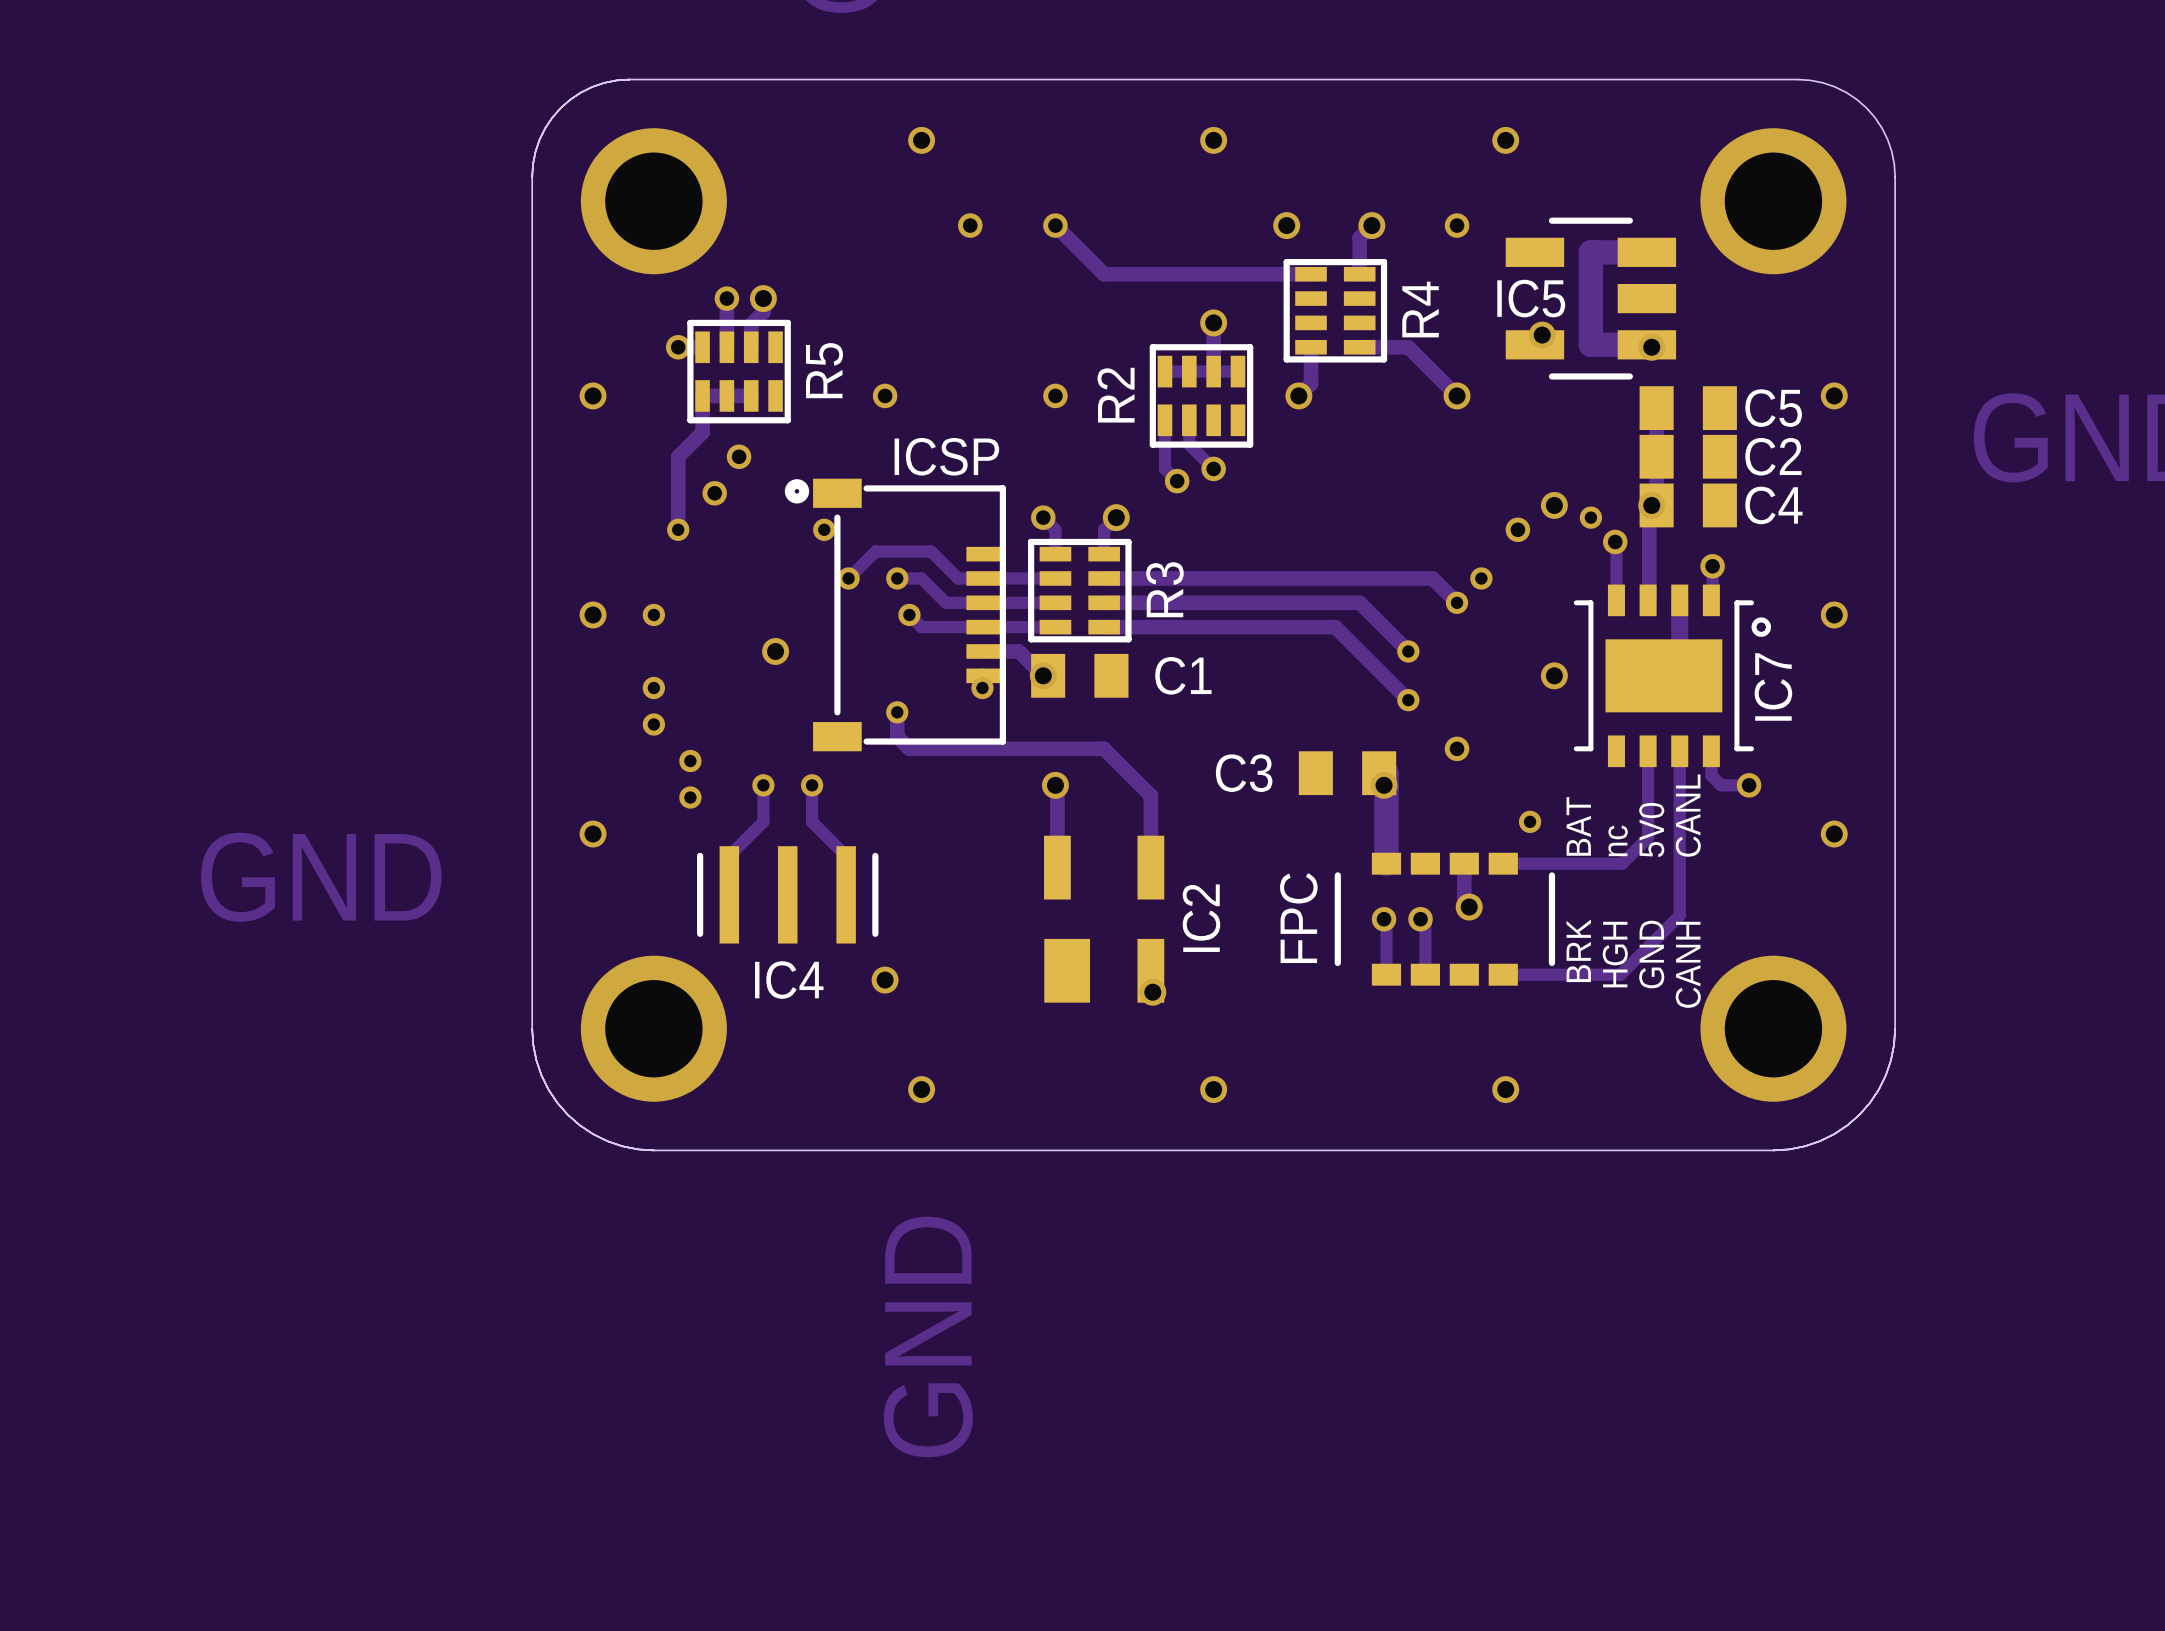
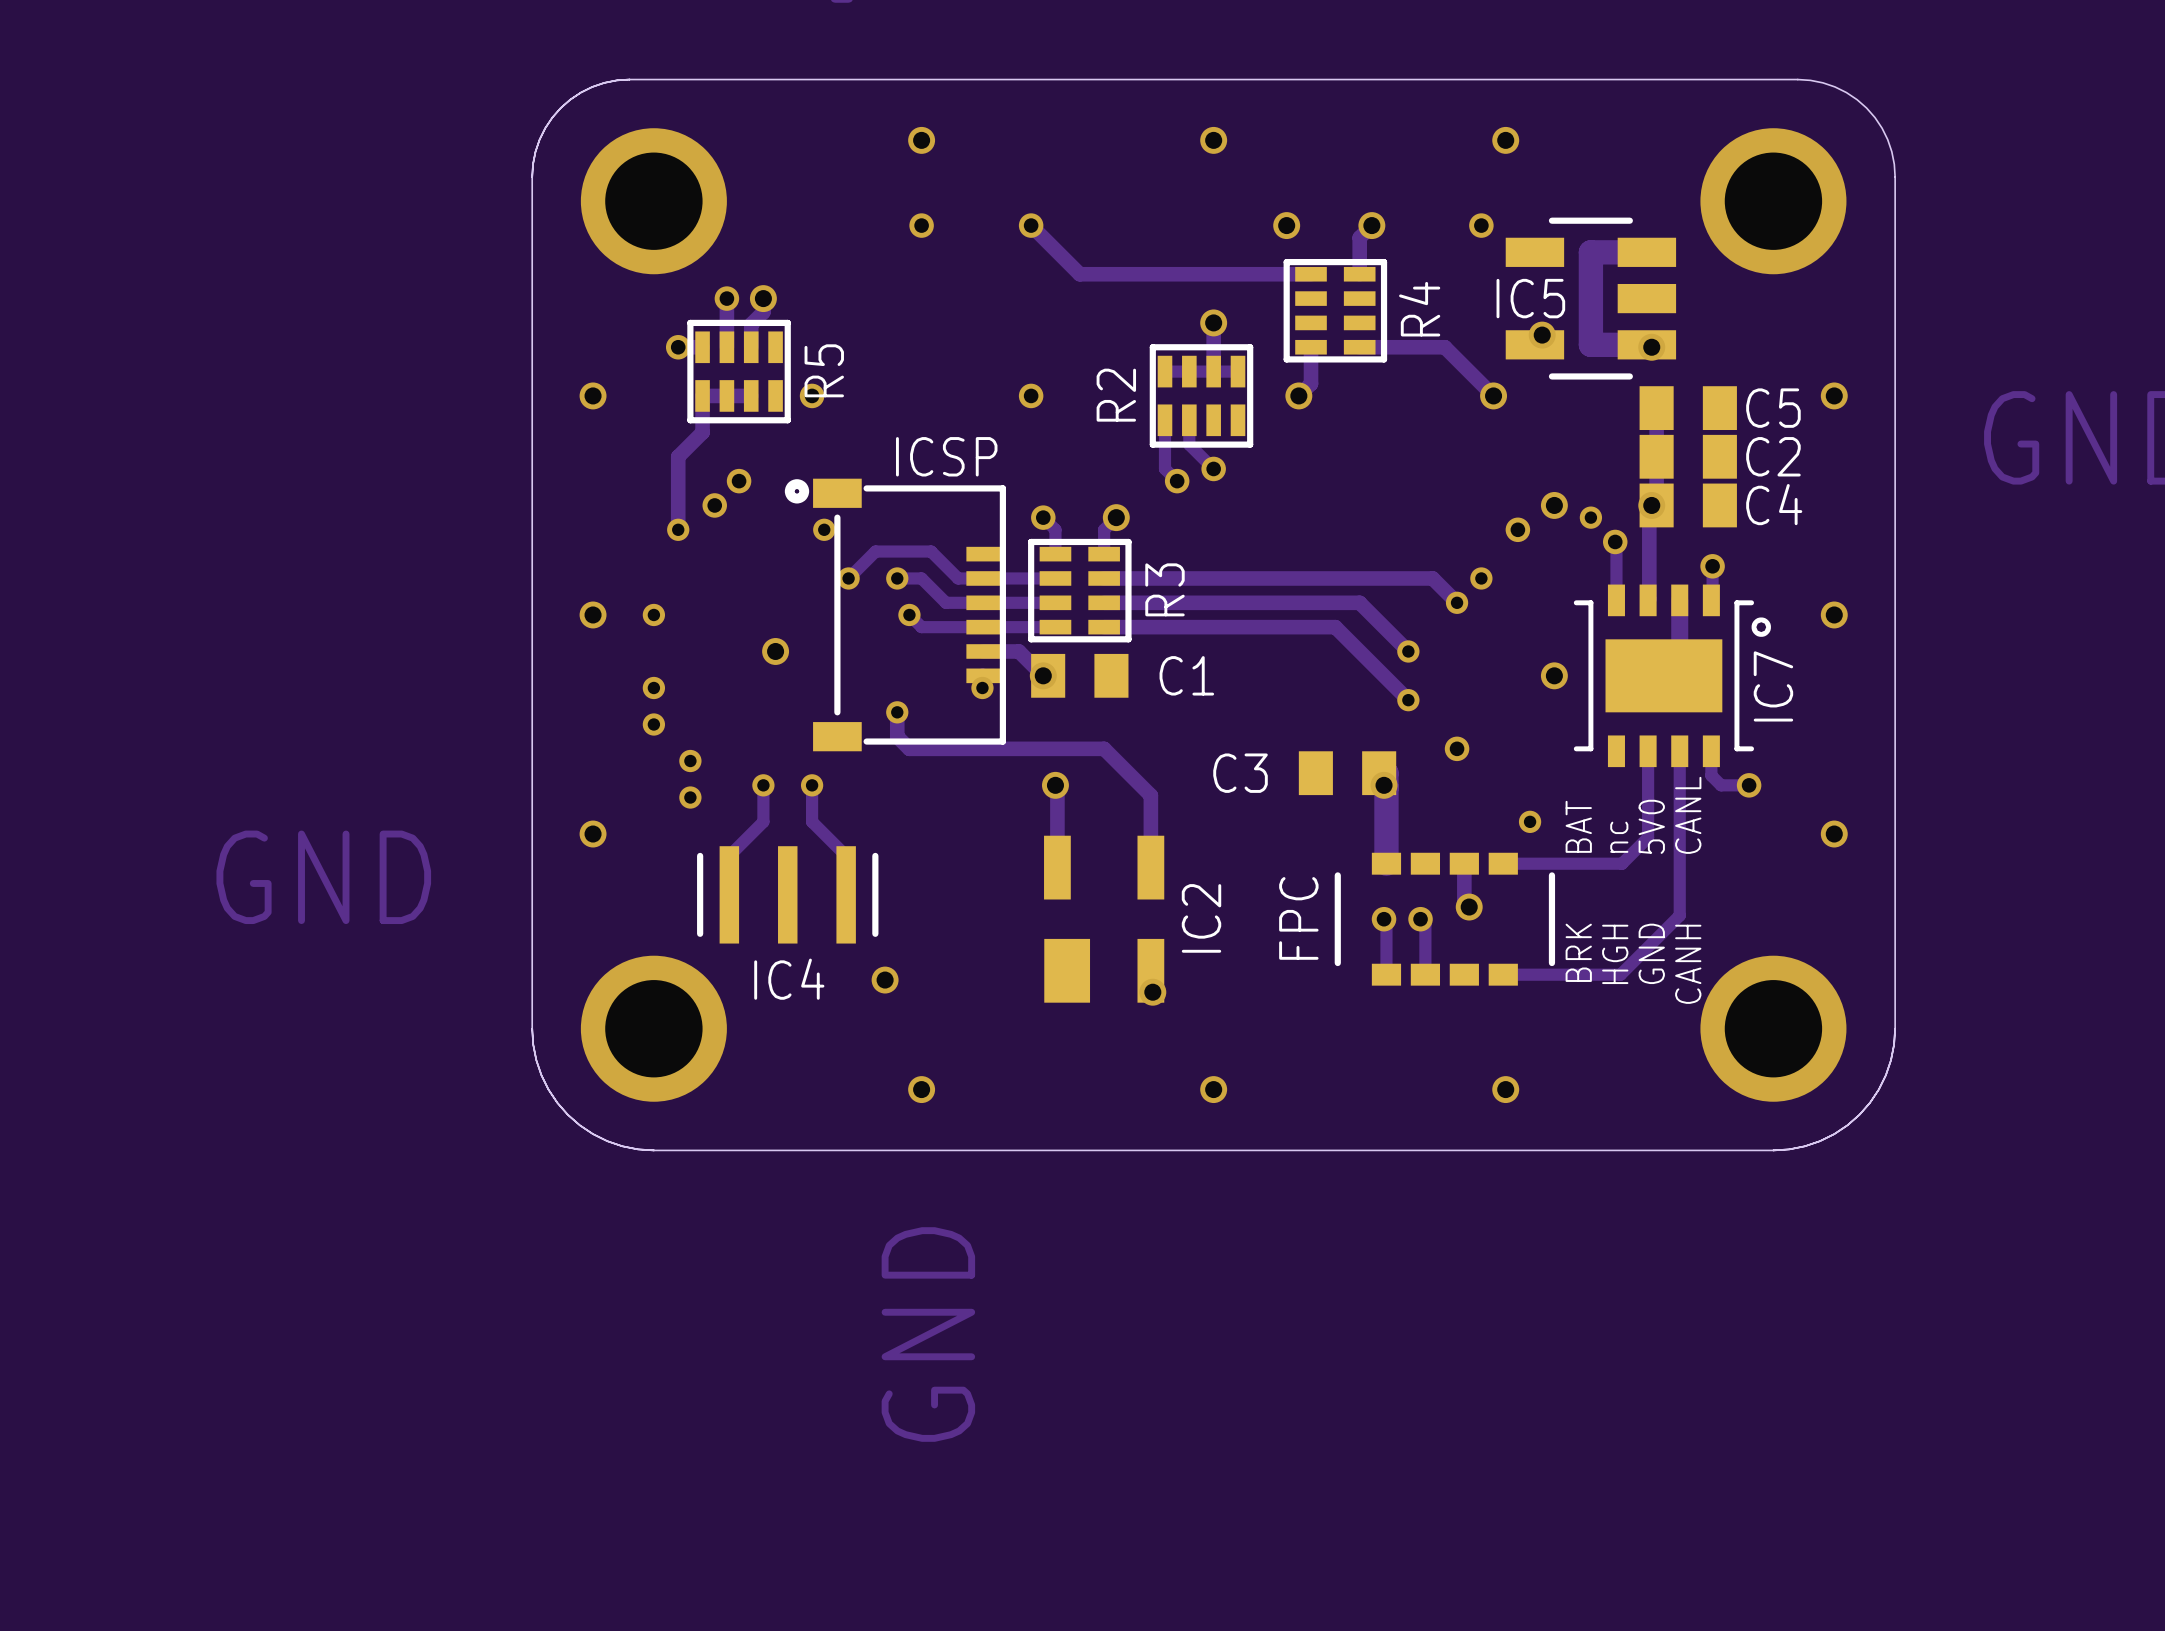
via: none -> (921, 225)
via: (970, 225) -> none
track: (1055, 225) (1104, 274) -> (1031, 225) (1079, 274) (1104, 274)
via position: (1055, 225) -> (1031, 225)
via position: (1457, 225) -> (1481, 225)
track: (1408, 347) (1457, 395) -> (1408, 347) (1444, 347) (1493, 395)
via: none -> (812, 395)
via: (885, 395) -> none
via position: (1055, 395) -> (1031, 395)
via position: (1457, 395) -> (1493, 395)
via position: (739, 456) -> (739, 481)
via position: (714, 493) -> (714, 505)

